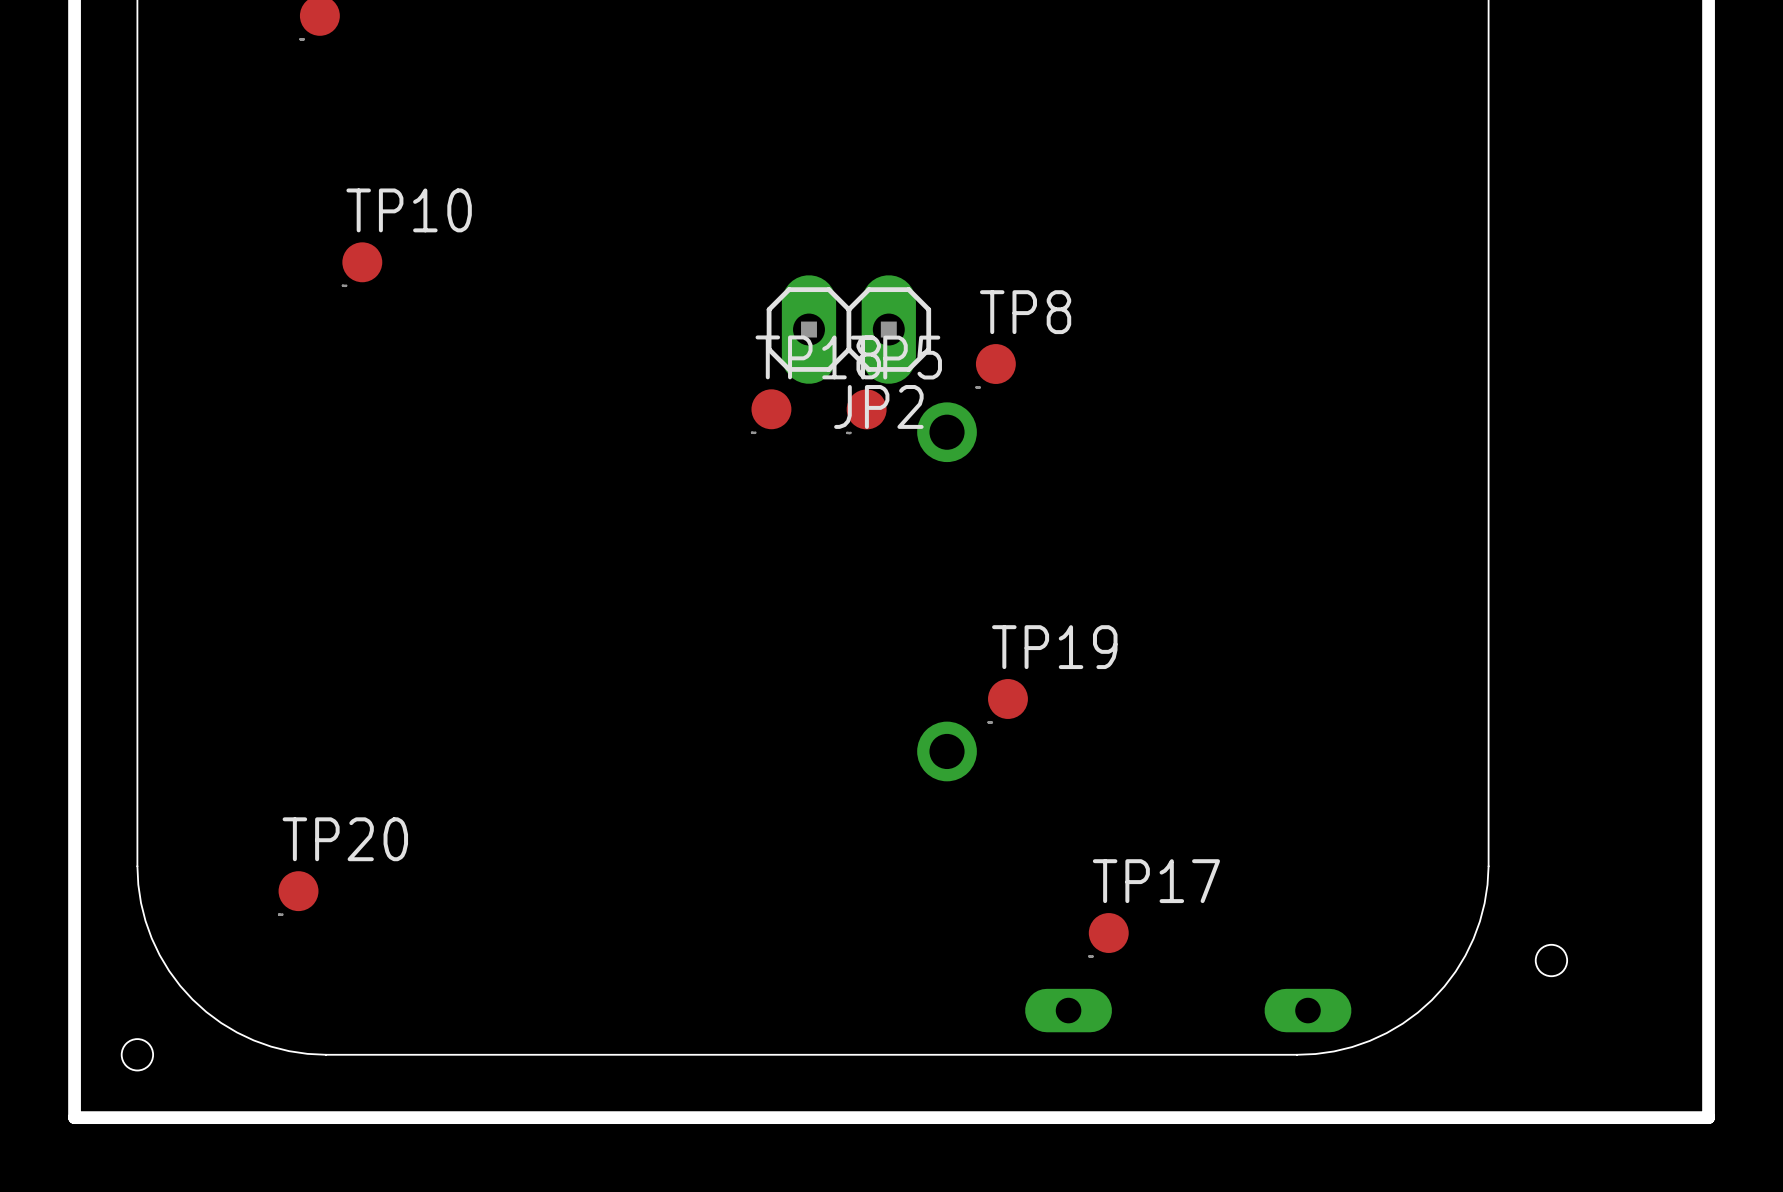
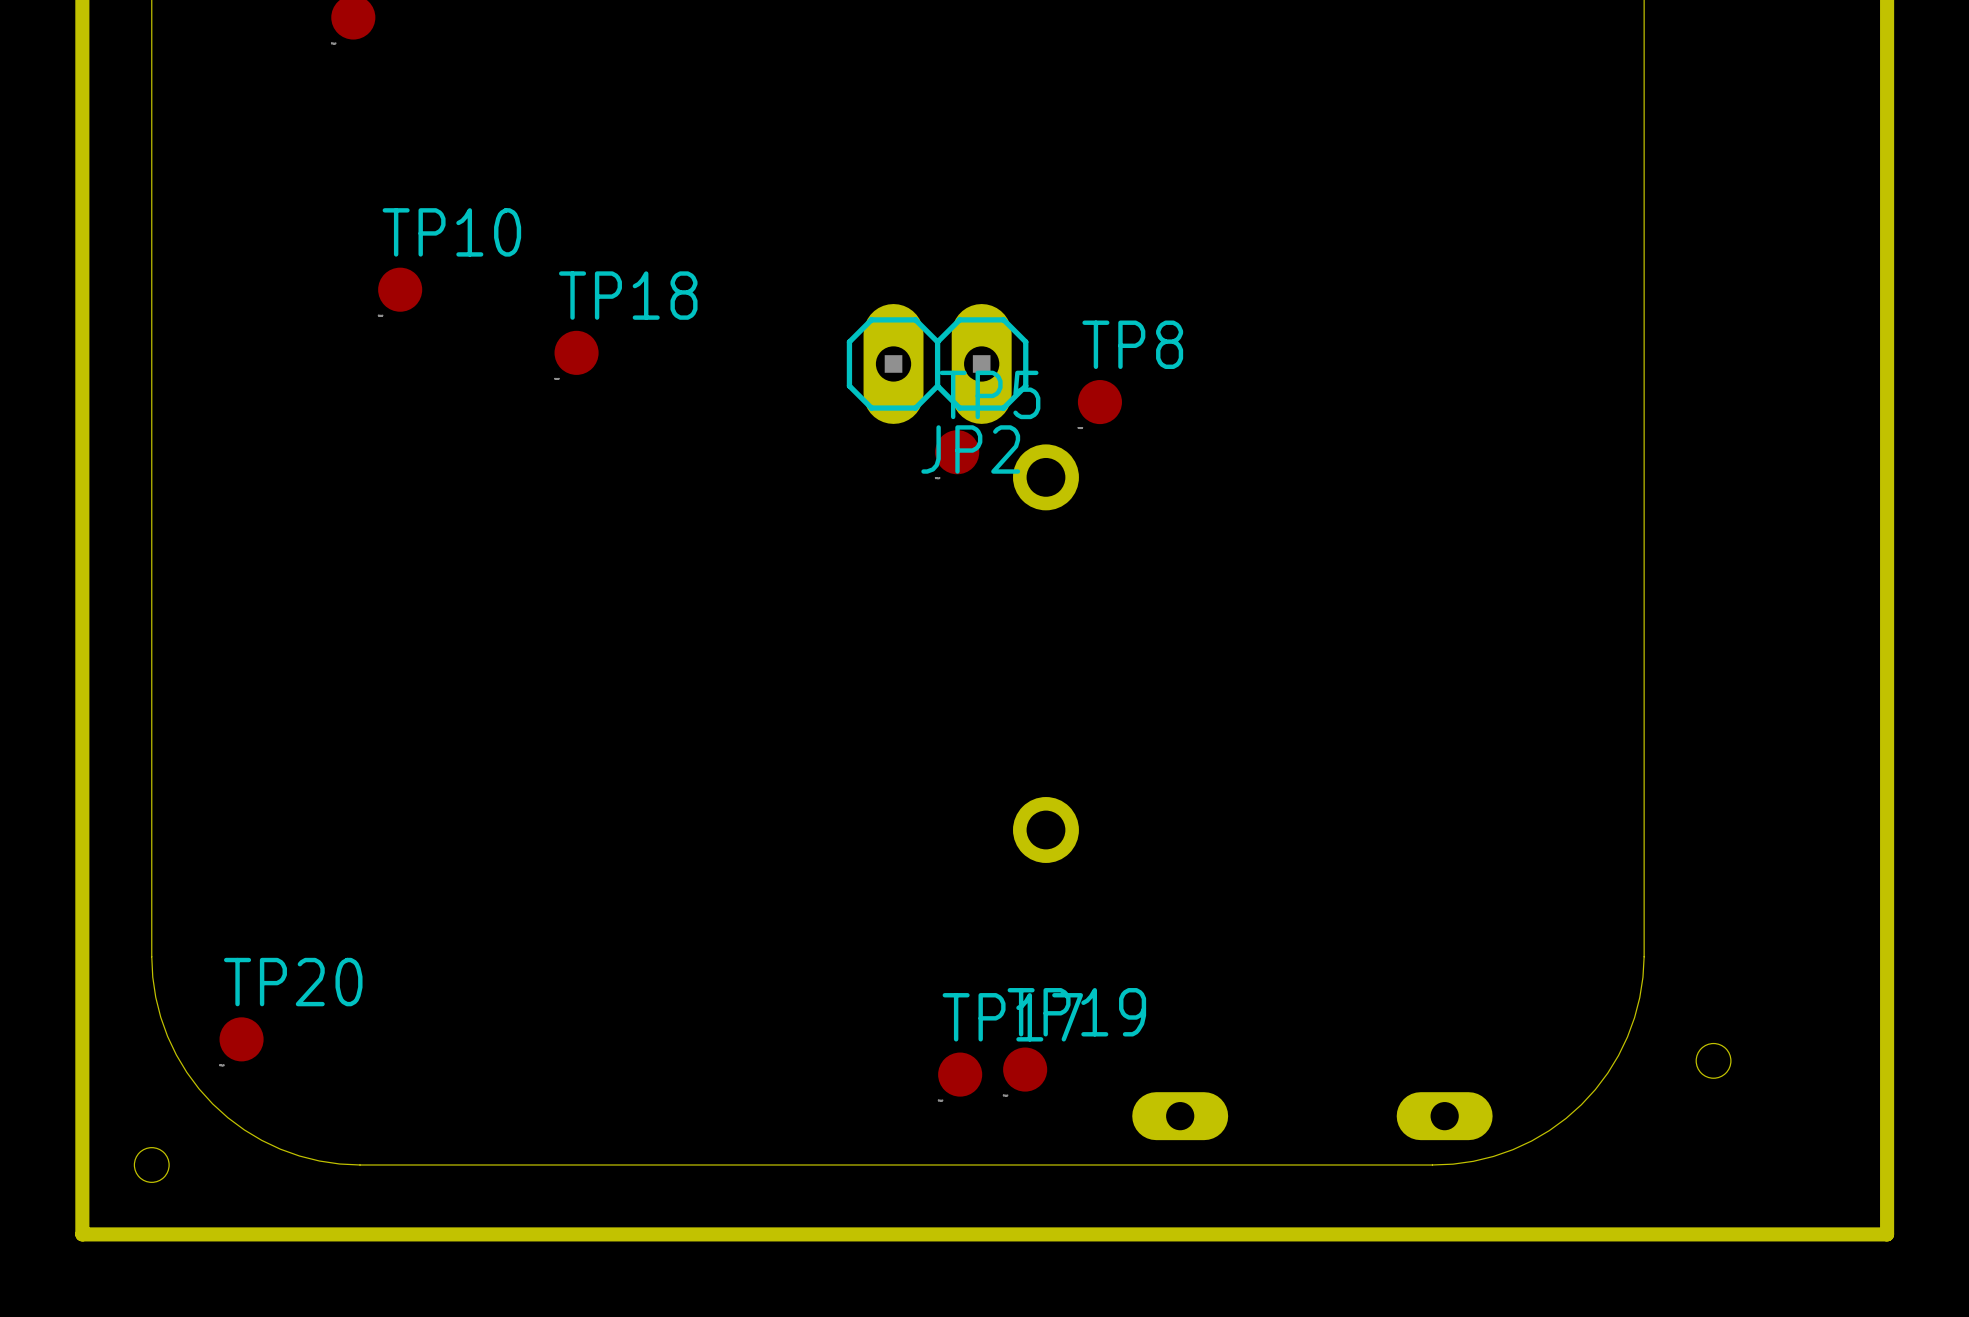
TP18 position: (771, 409) -> (576, 352)
TP19 position: (1007, 698) -> (1025, 1069)
TP20 position: (298, 891) -> (241, 1039)
TP17 position: (1108, 933) -> (960, 1074)

